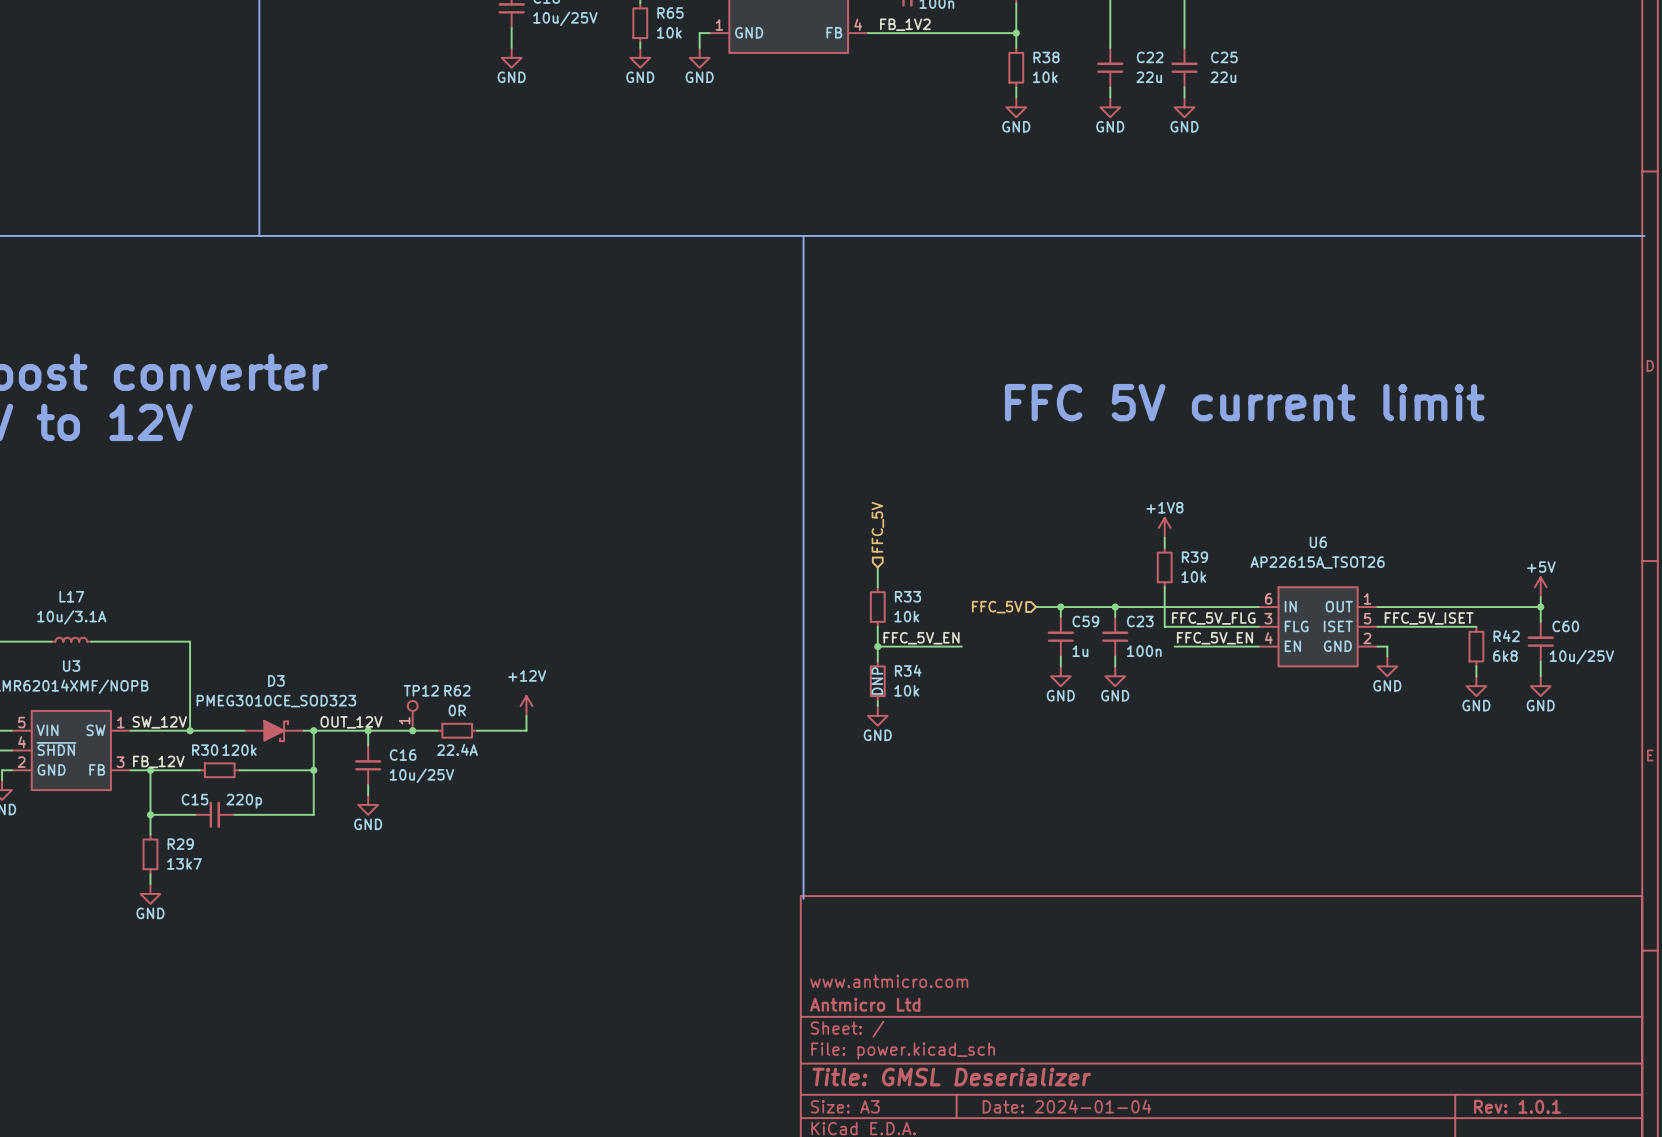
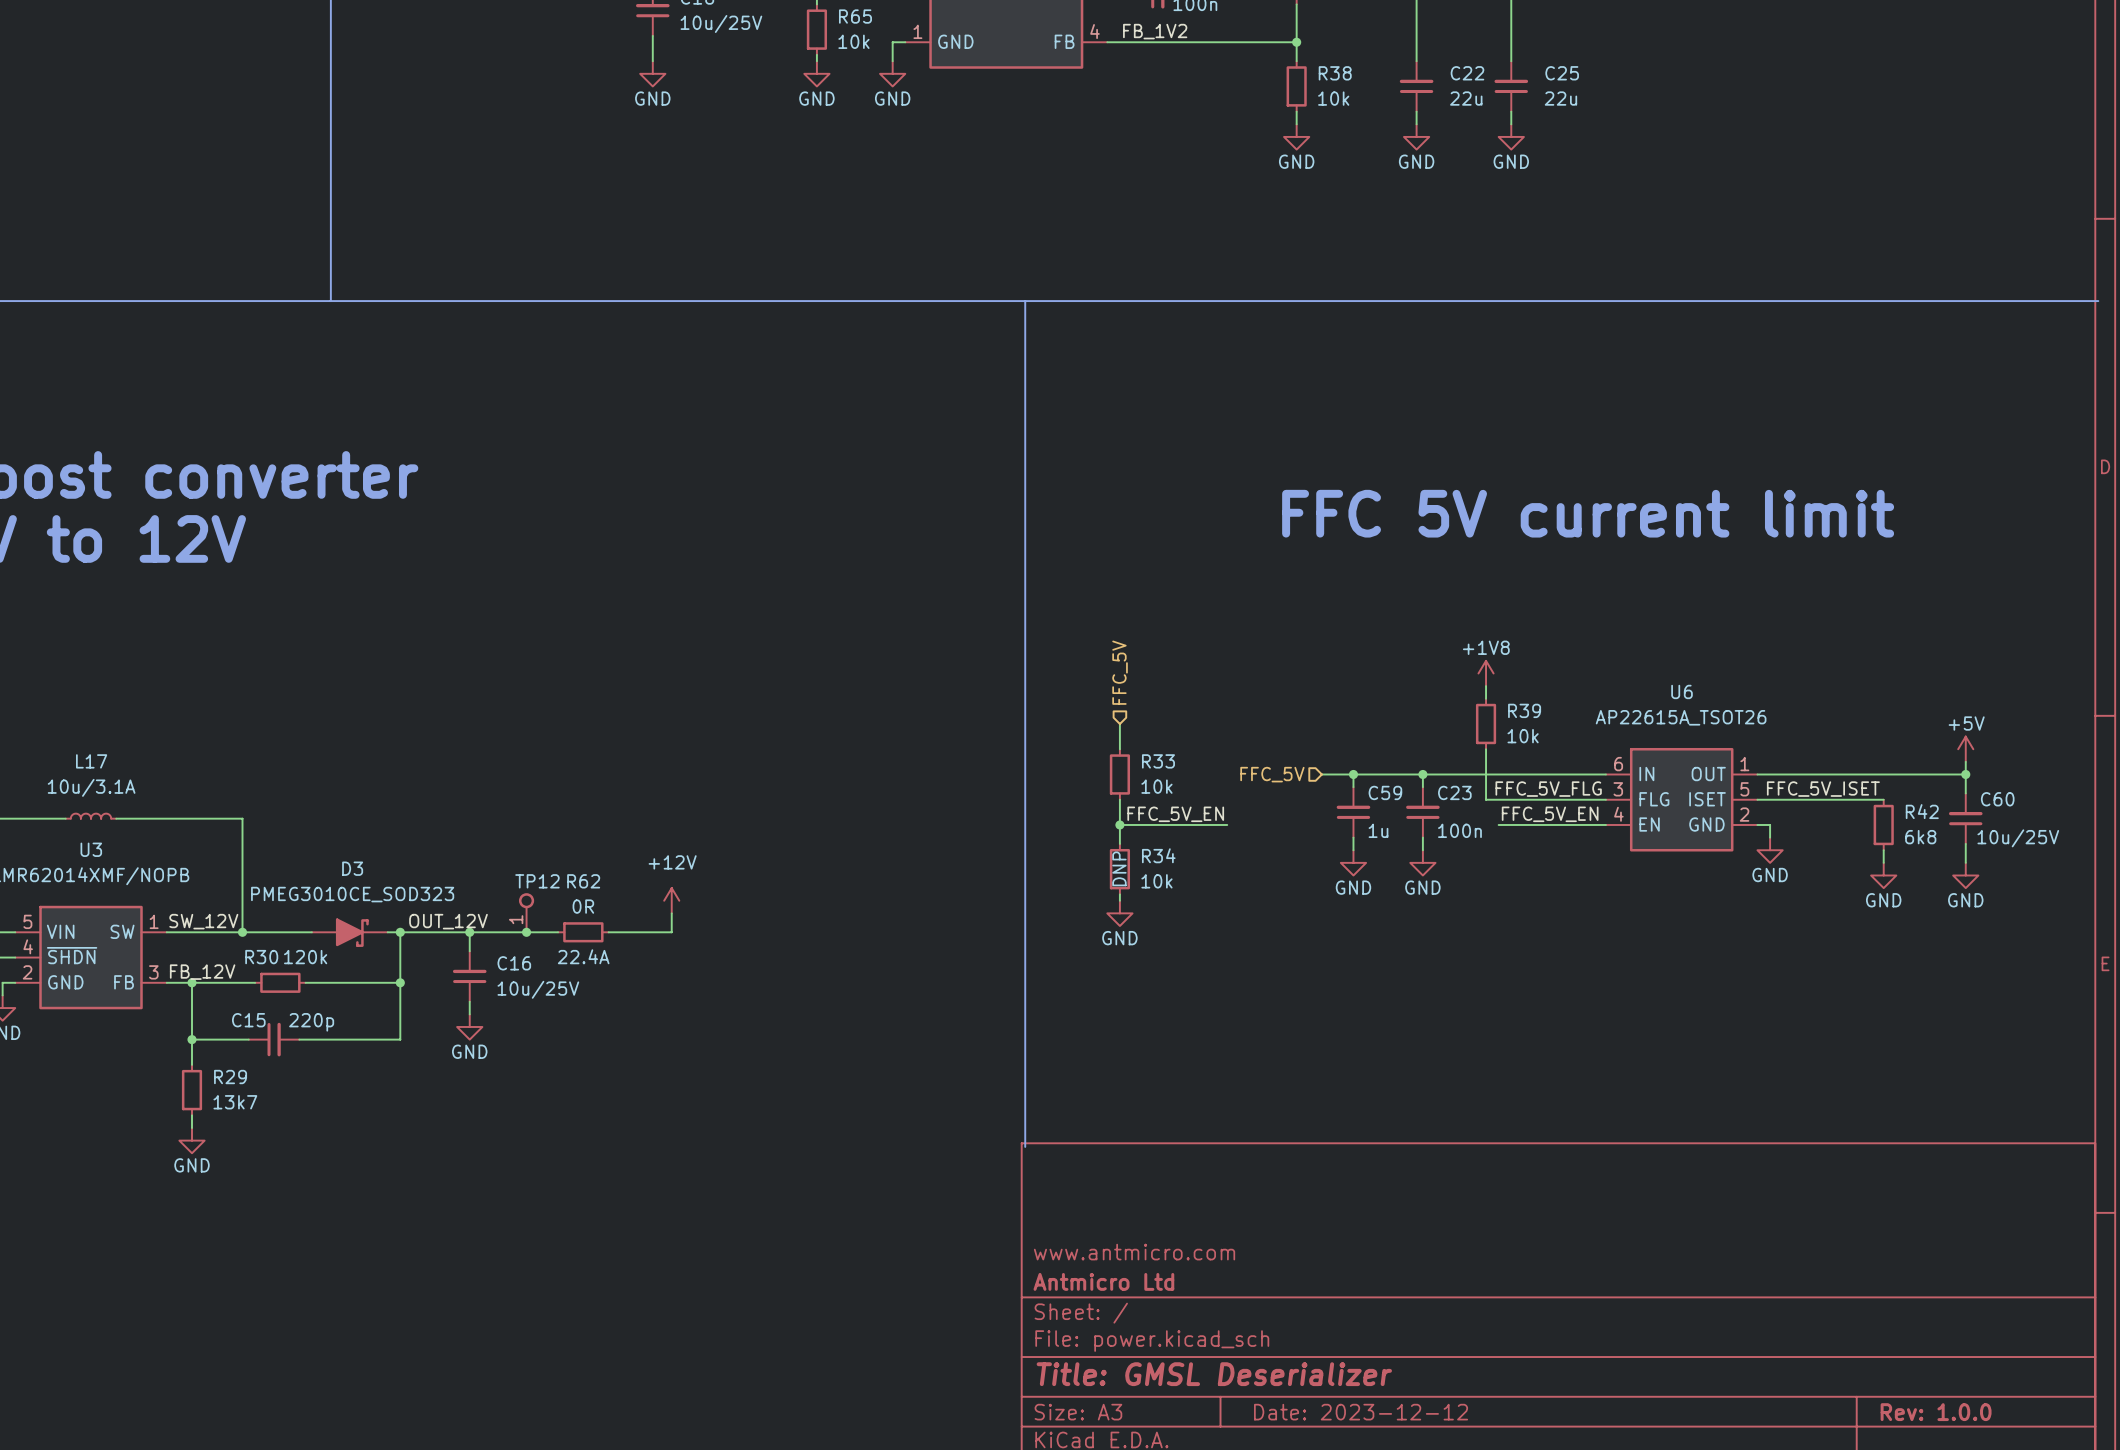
title block: Date: 2024-01-04 (1067, 1106) -> Date: 2023-12-12 (1361, 1412)
title block: Rev: 1.0.1 (1517, 1106) -> Rev: 1.0.0 (1936, 1412)

